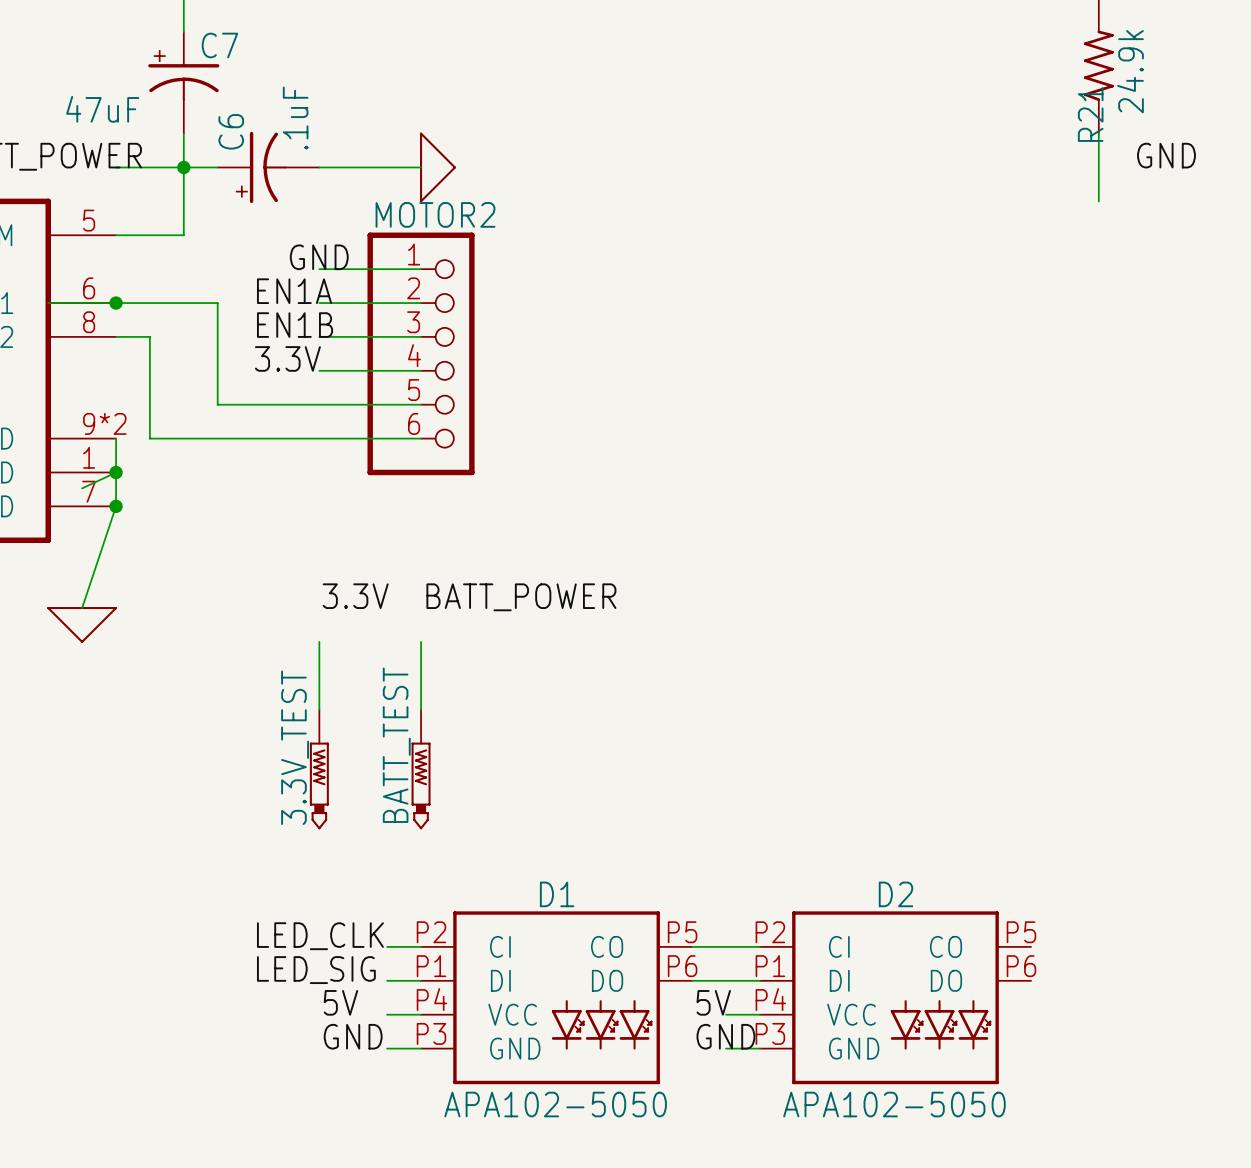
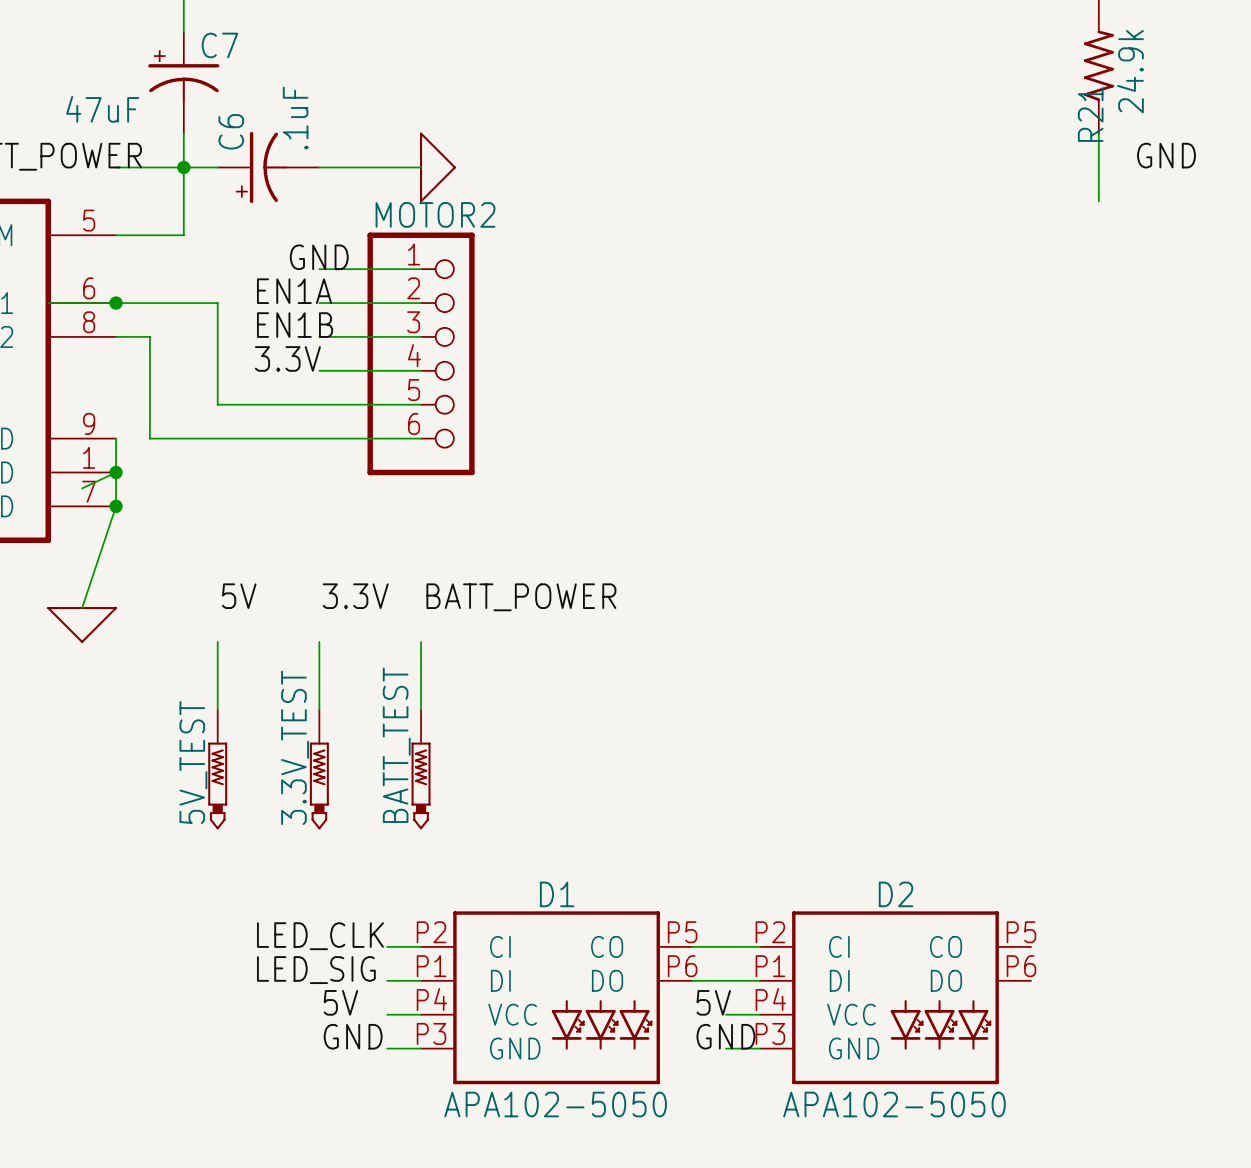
part pin number: 9*2 (104, 423) -> 9 (89, 423)
label: none -> 5V (239, 596)
wire: none -> (217, 641) (217, 709)
5V_TEST: none -> (217, 769)

